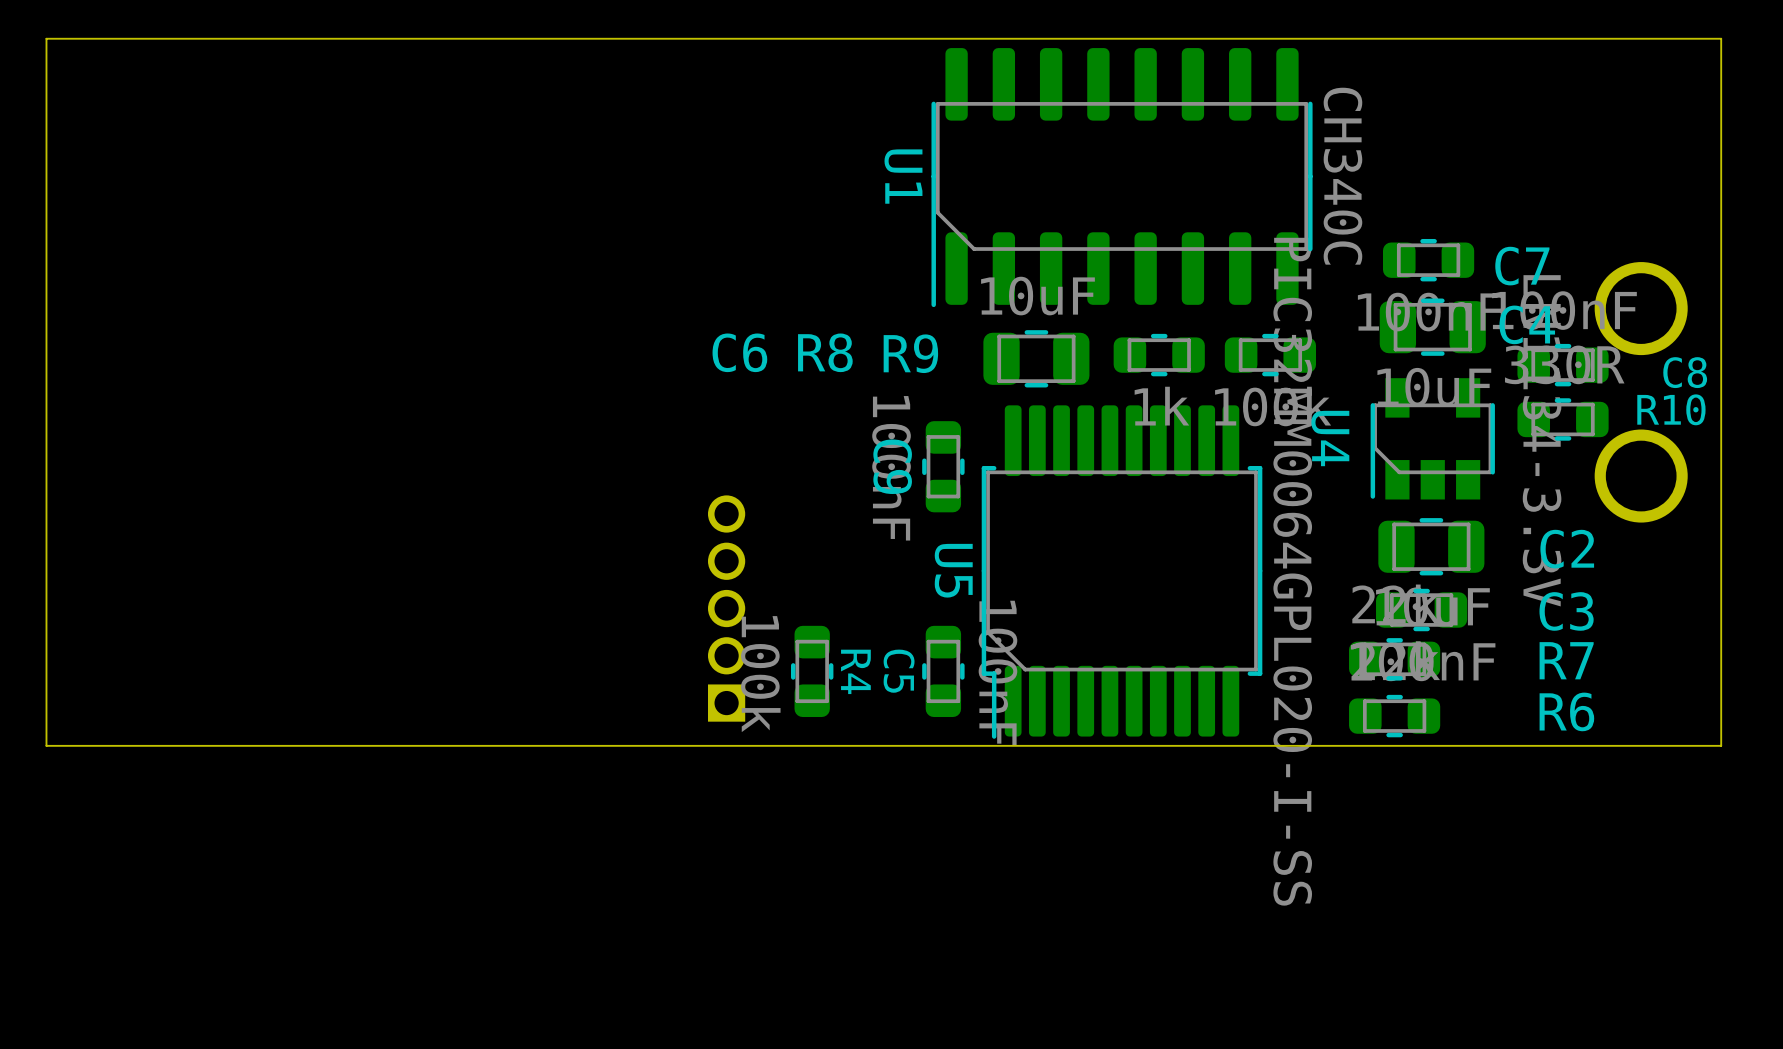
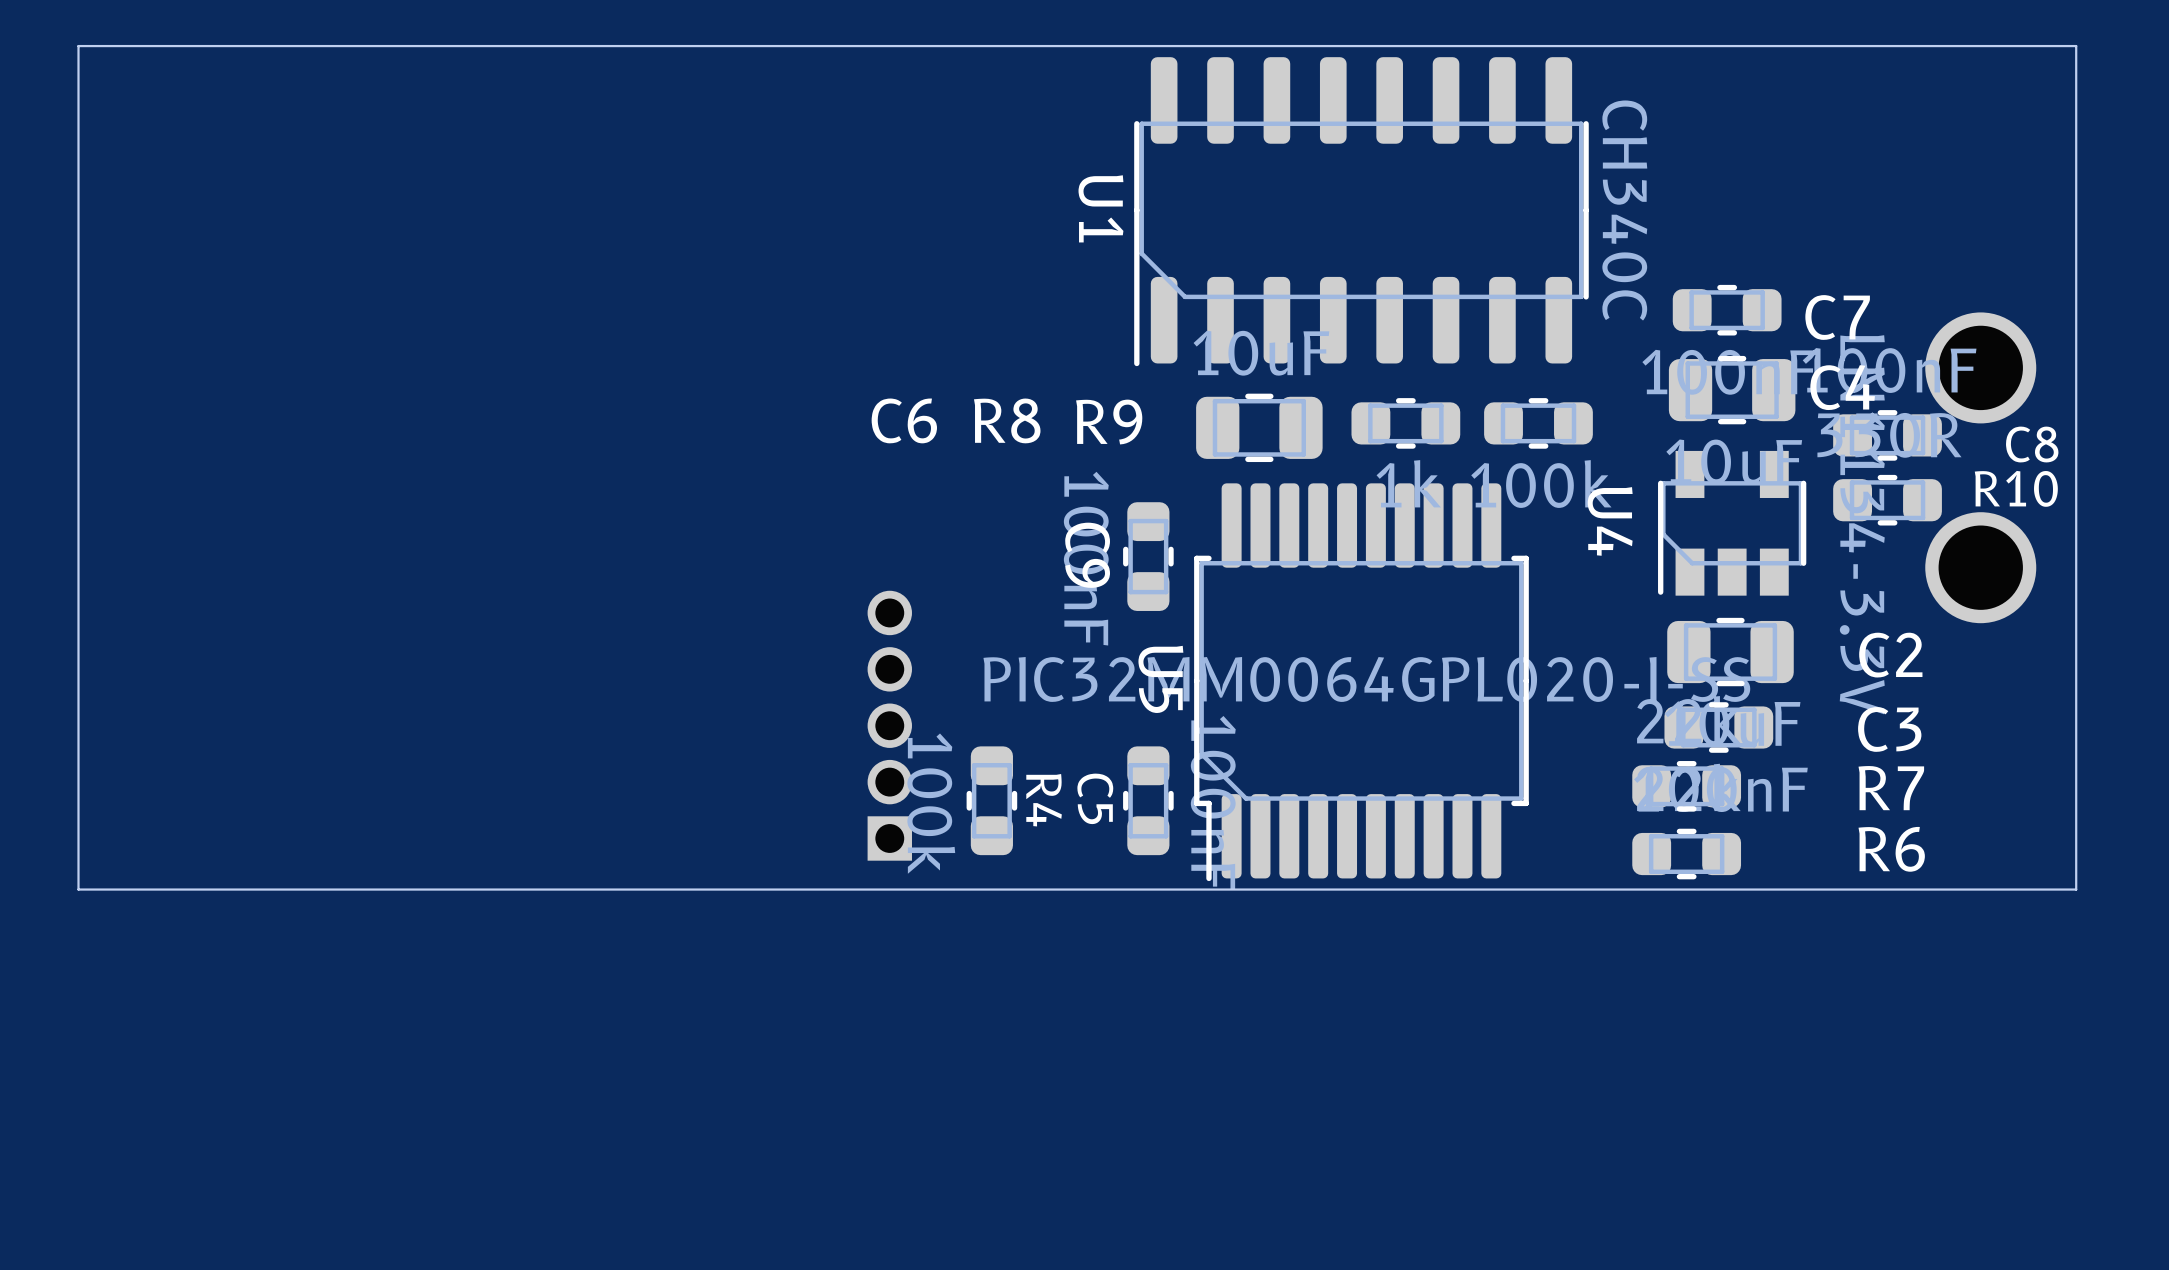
U5 value rotation: 0° (1292, 571) -> 90° counterclockwise (1366, 679)

